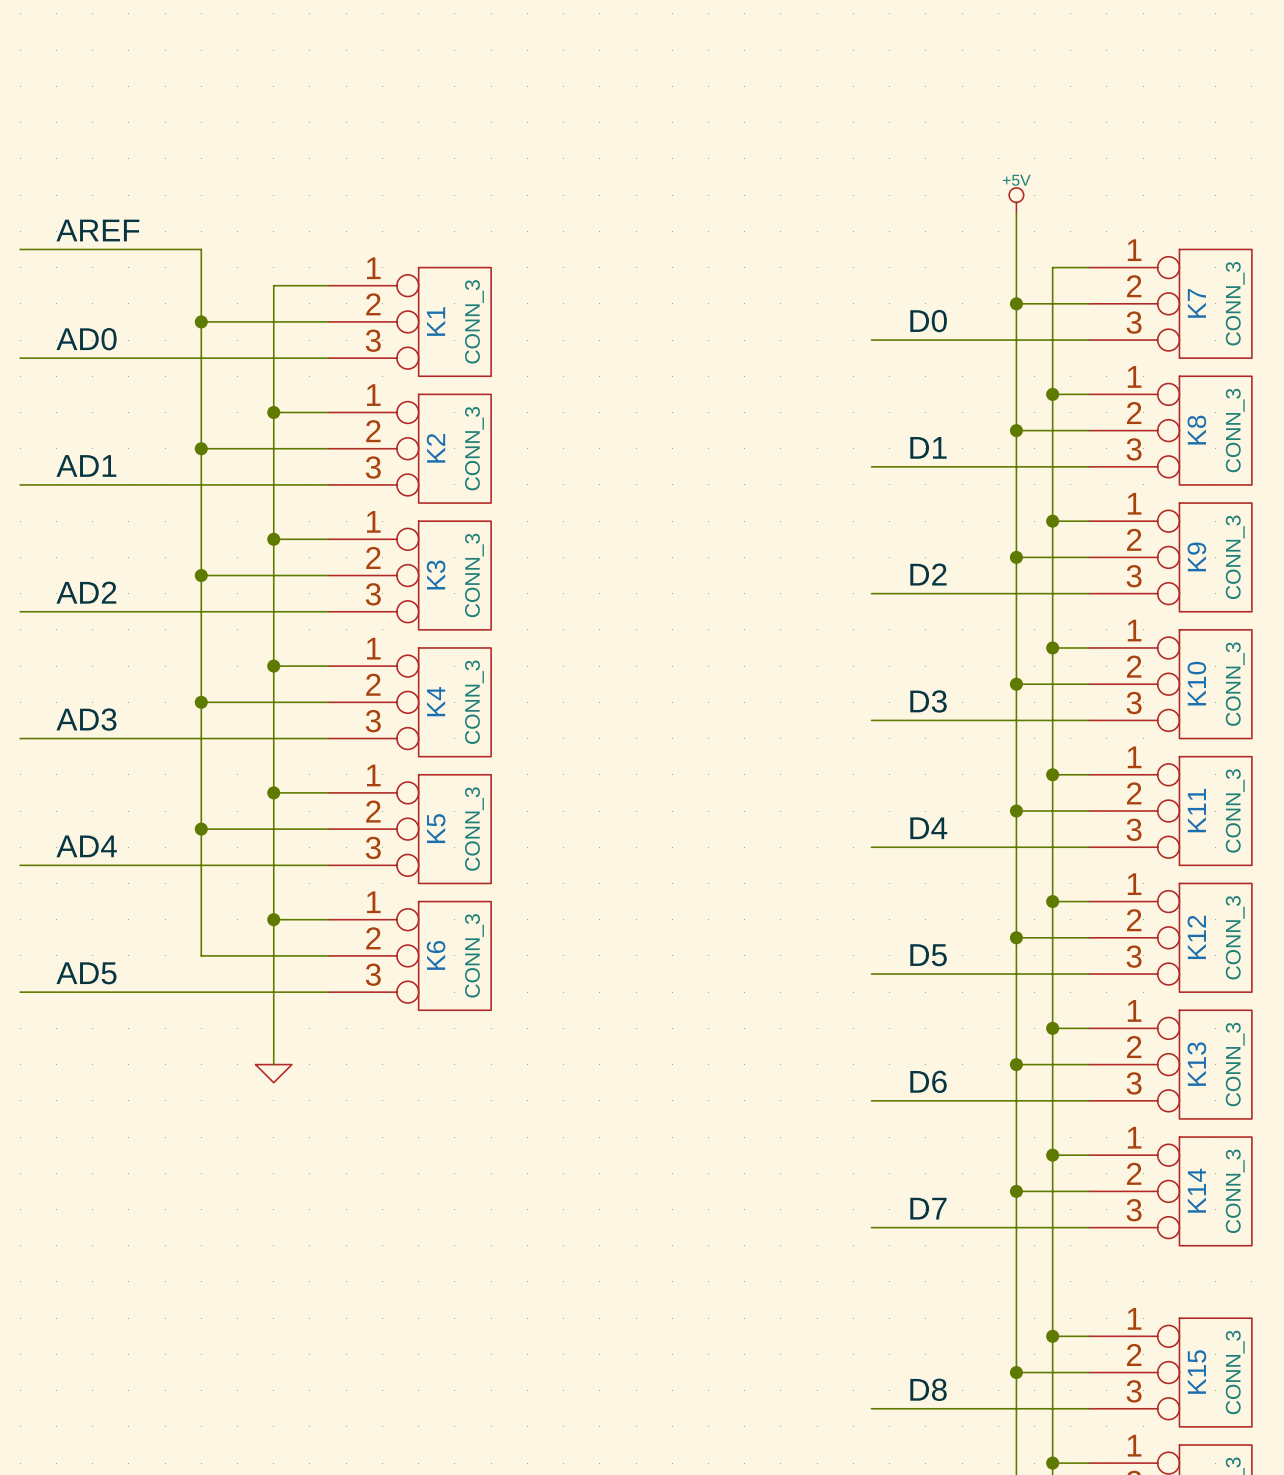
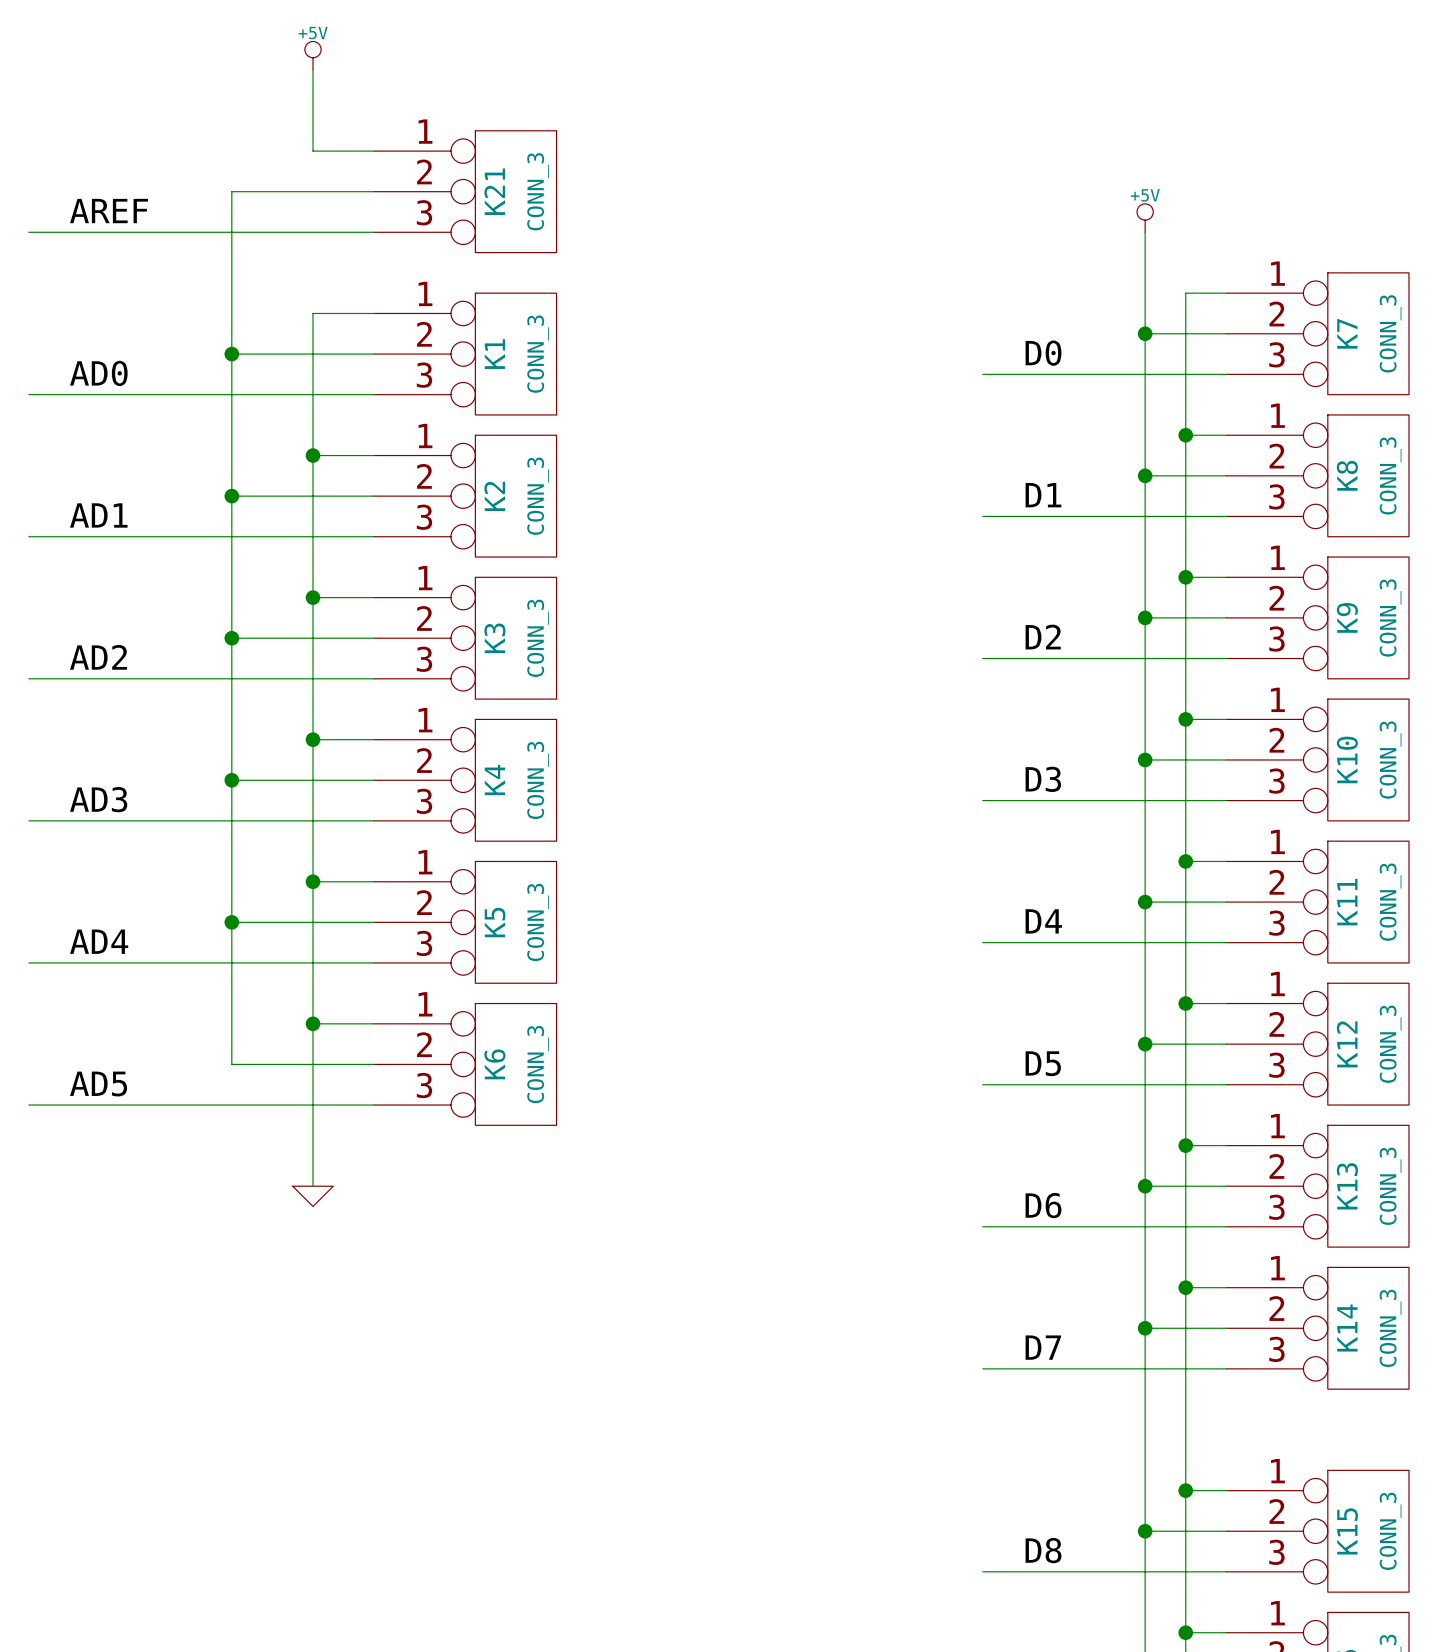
power symbol: none -> +5V (313, 55)
wire: none -> (313, 69) (313, 151) (373, 151)
K21: none -> CONN_3 (465, 191)
wire: none -> (28, 232) (373, 232)
label position: AREF (97, 230) -> AREF (108, 211)
wire: (20, 249) (201, 249) -> (373, 191) (231, 191) (231, 272)

